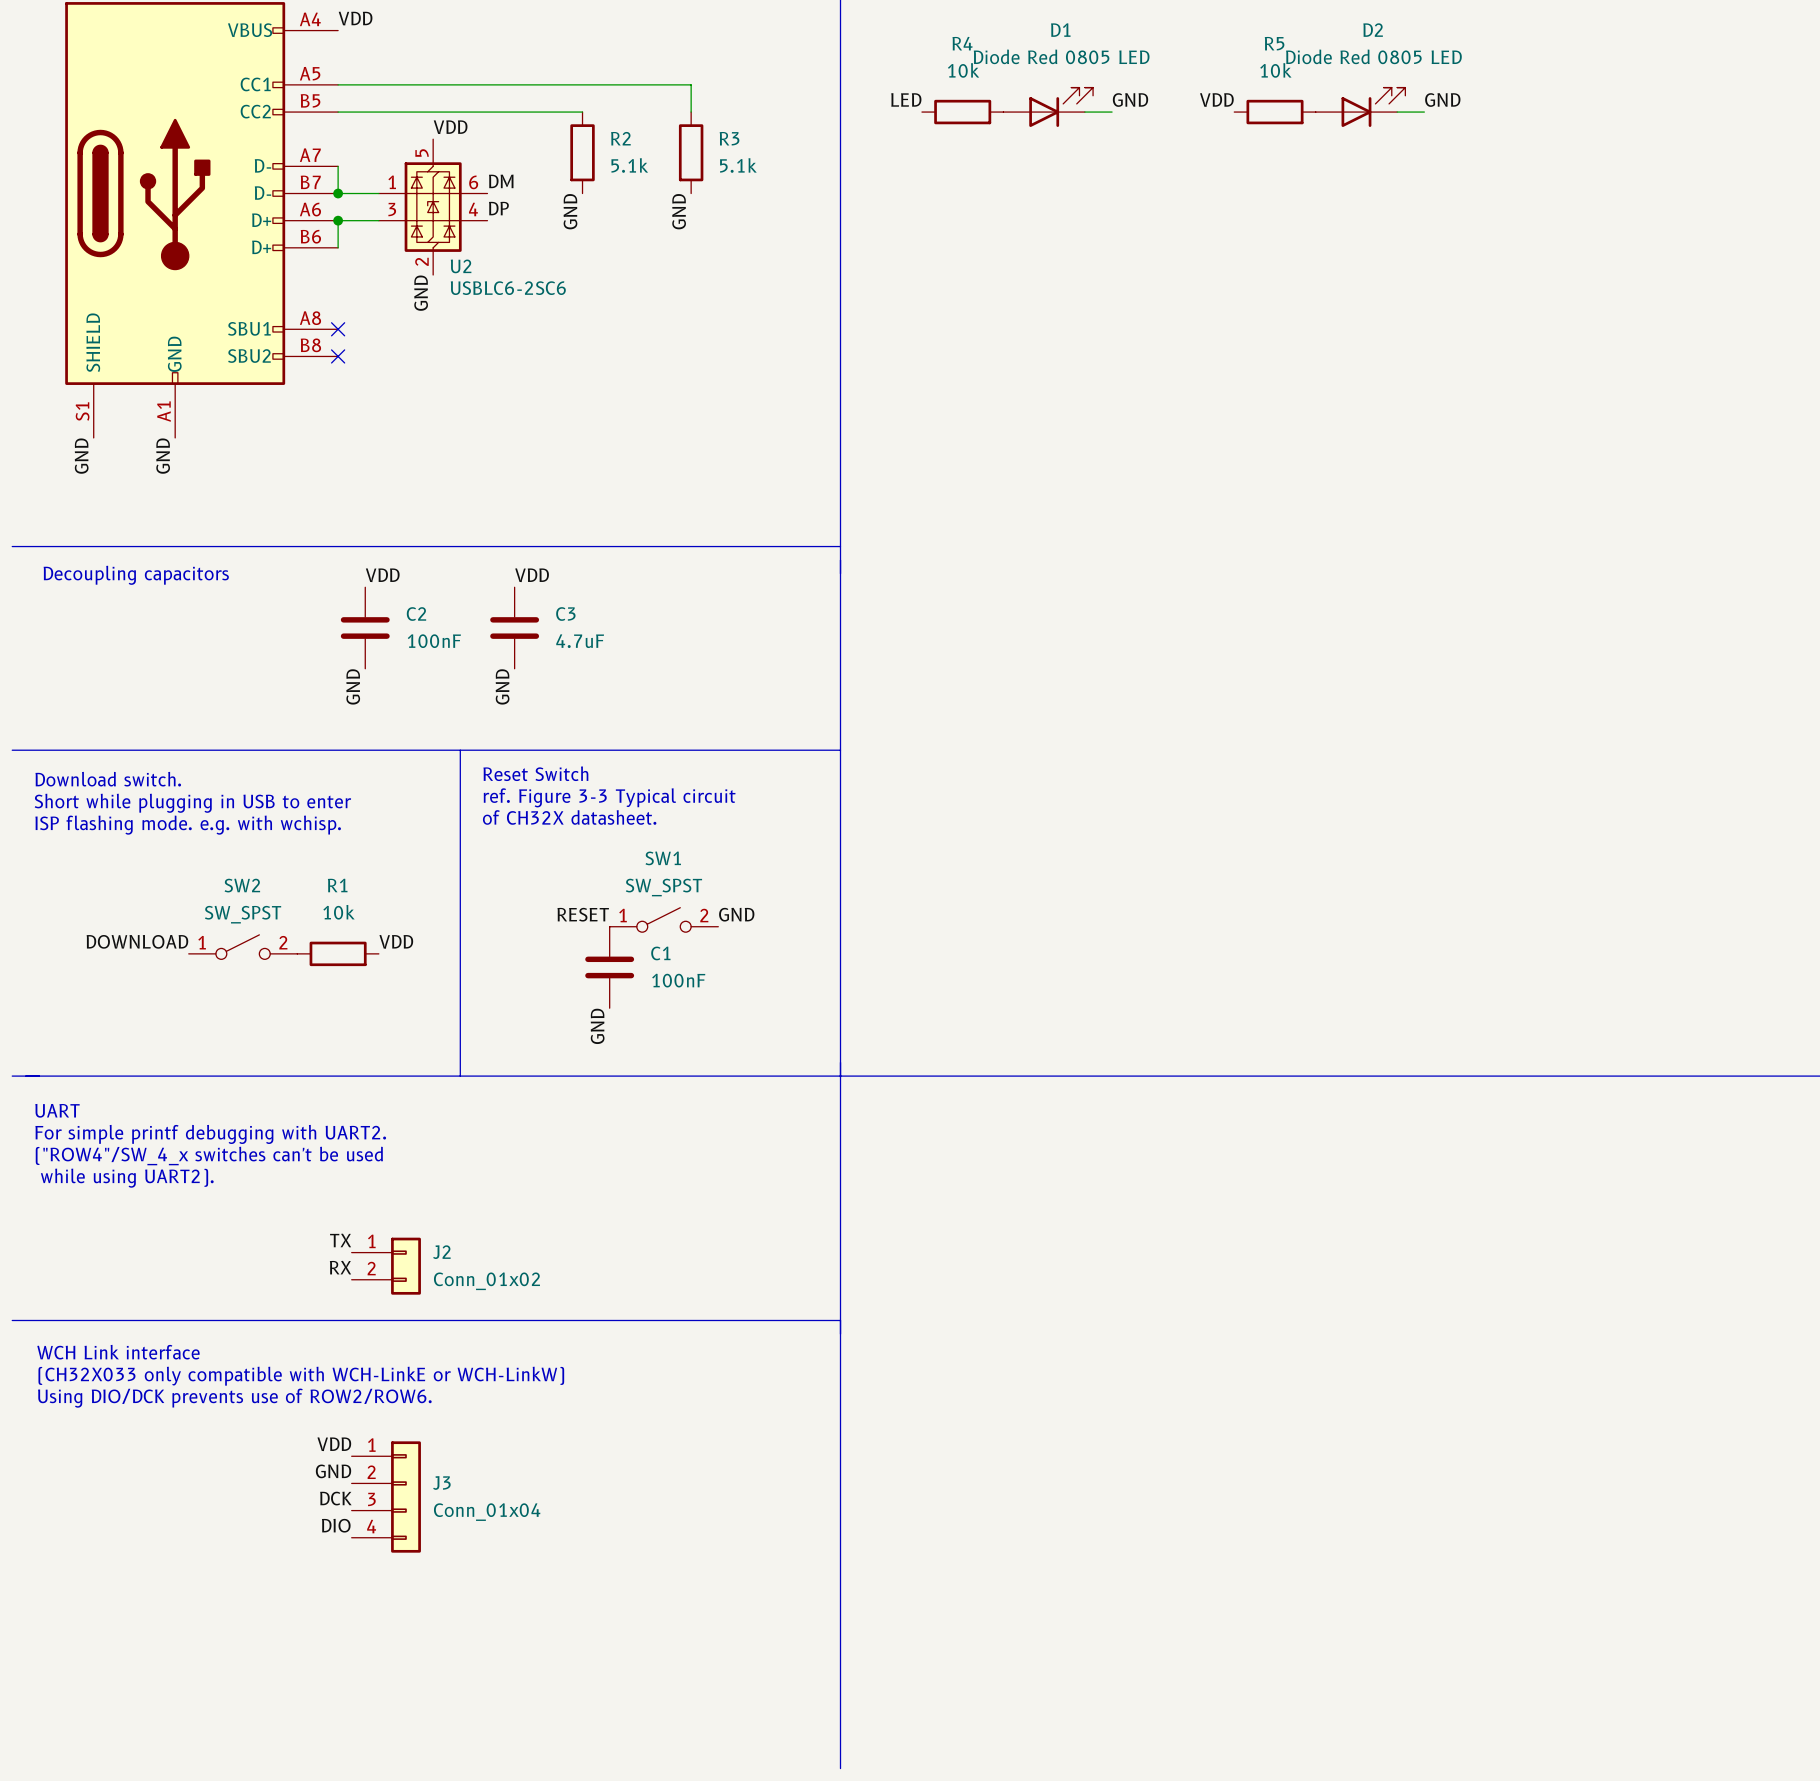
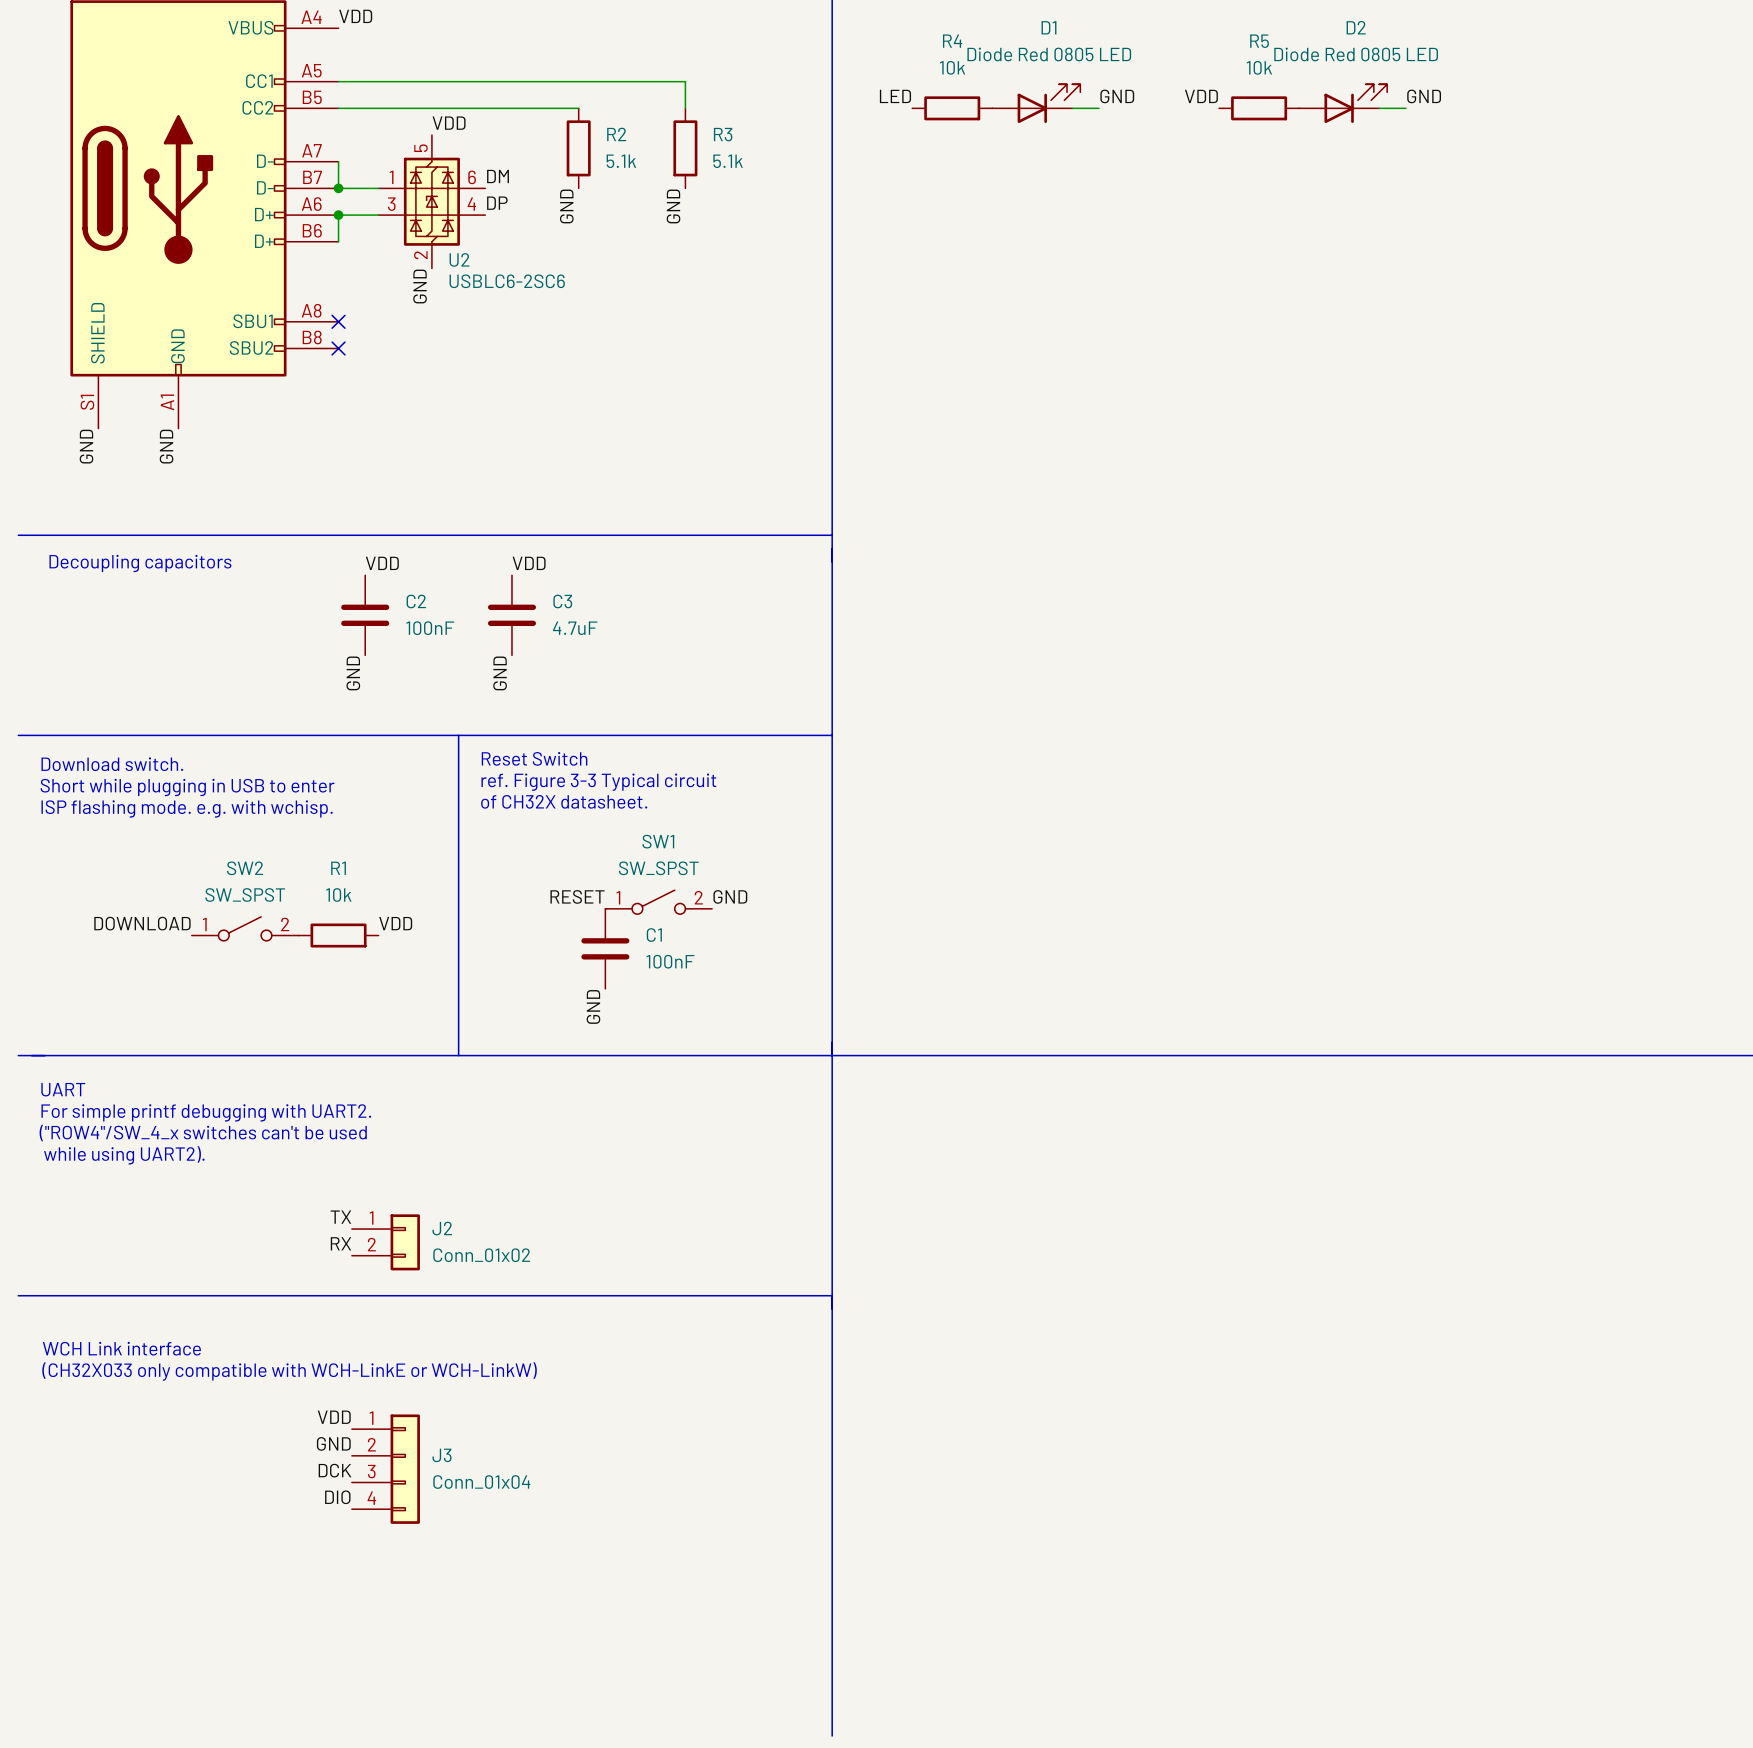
text: WCH Link interface (118, 1352) -> none
text: (CH32X033 only compatible with WCH-LinkE or WCH-LinkW) (301, 1376) -> WCH Link interface (121, 1348)
text: Using DIO/DCK prevents use of ROW2/ROW6. (234, 1398) -> (CH32X033 only compatible with WCH-LinkE or WCH-LinkW) (289, 1371)

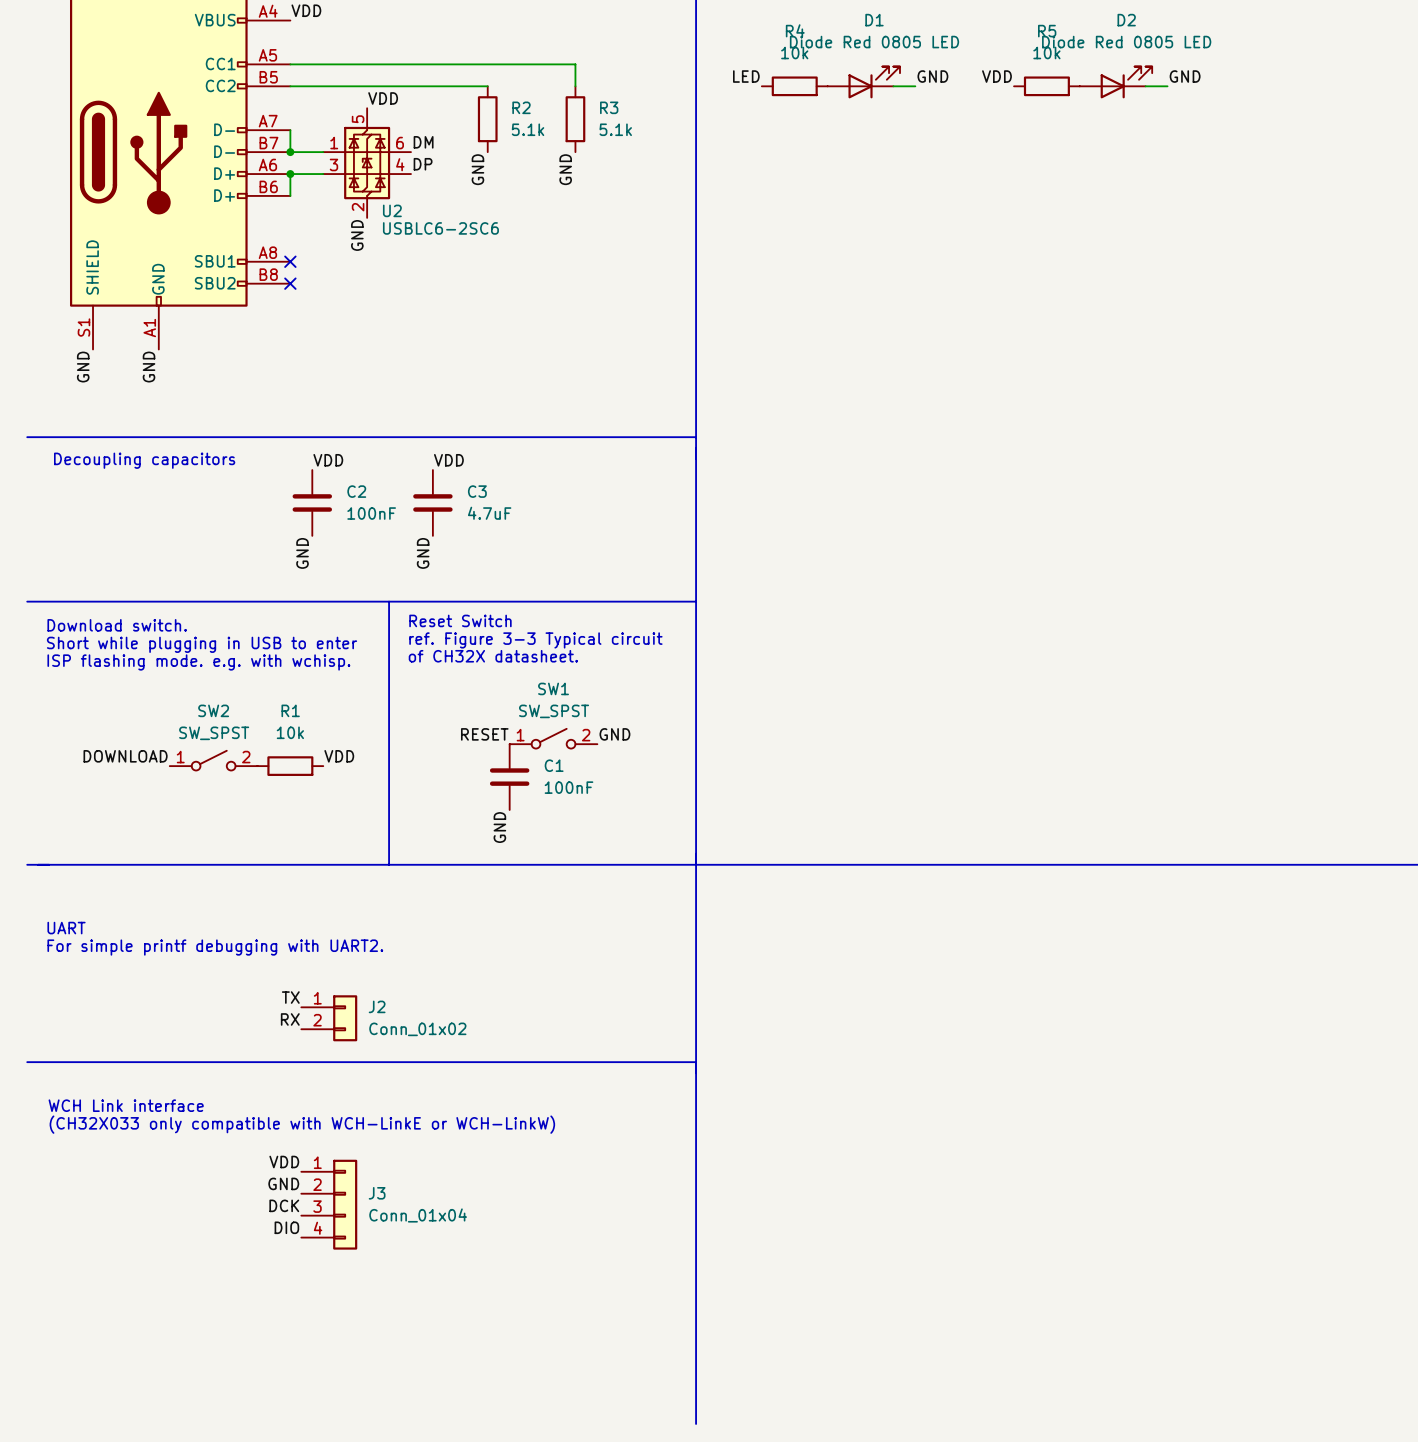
text: UART (63, 1089) -> none
text: For simple printf debugging with UART2. (206, 1112) -> none
text: ("ROW4"/SW_4_x switches can't be used (203, 1132) -> UART (66, 928)
text: while using UART2). (124, 1155) -> For simple printf debugging with UART2. (215, 947)

